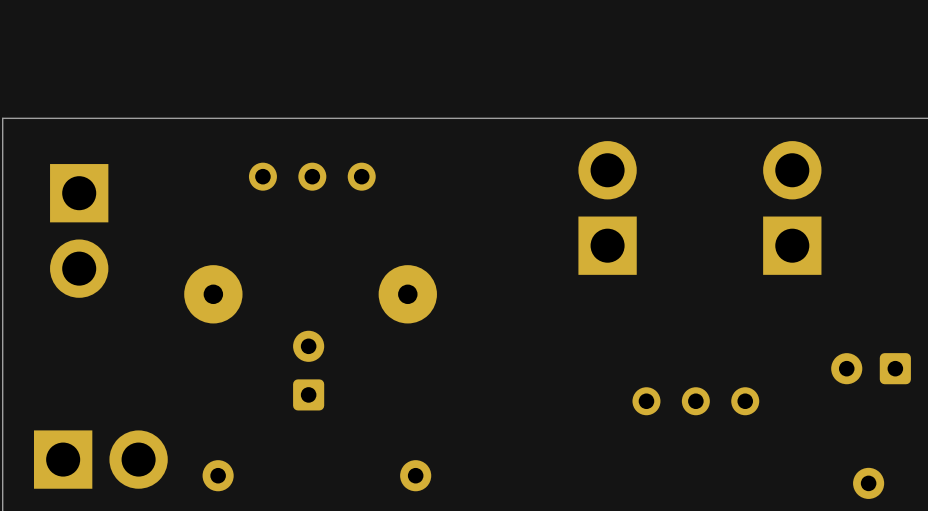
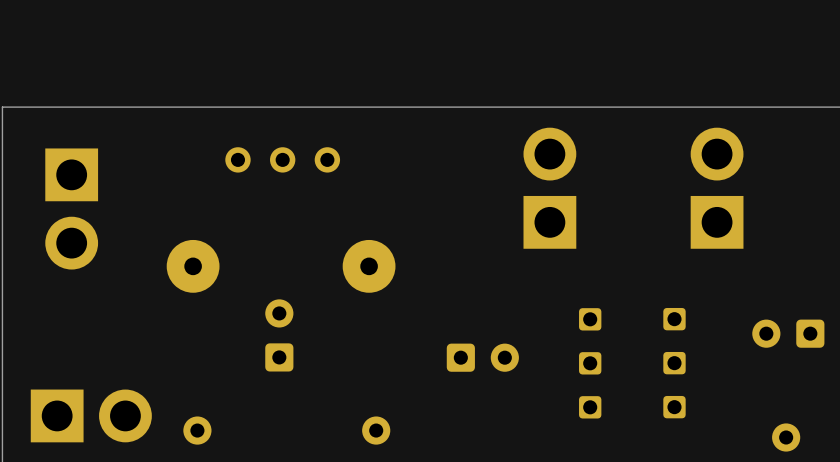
part: none -> (482, 357)
part: none -> (590, 363)
part: (695, 401) -> none
part: none -> (674, 363)

